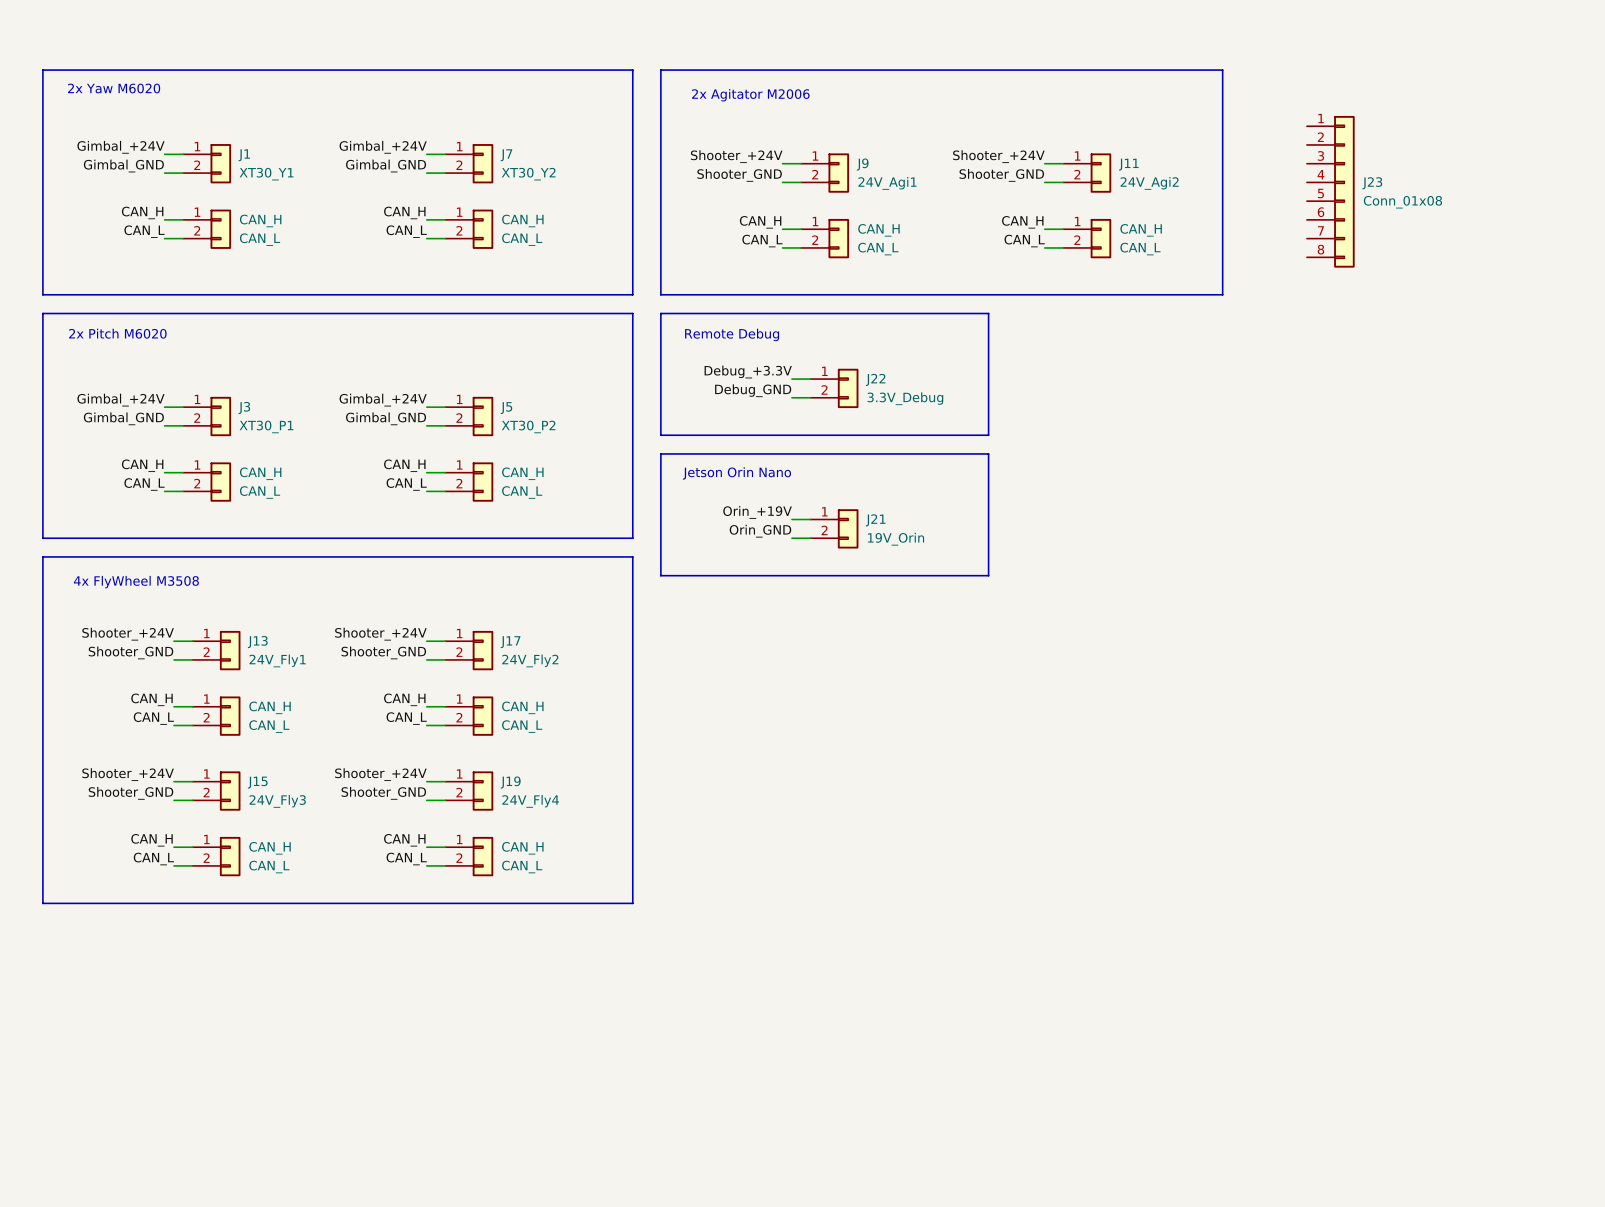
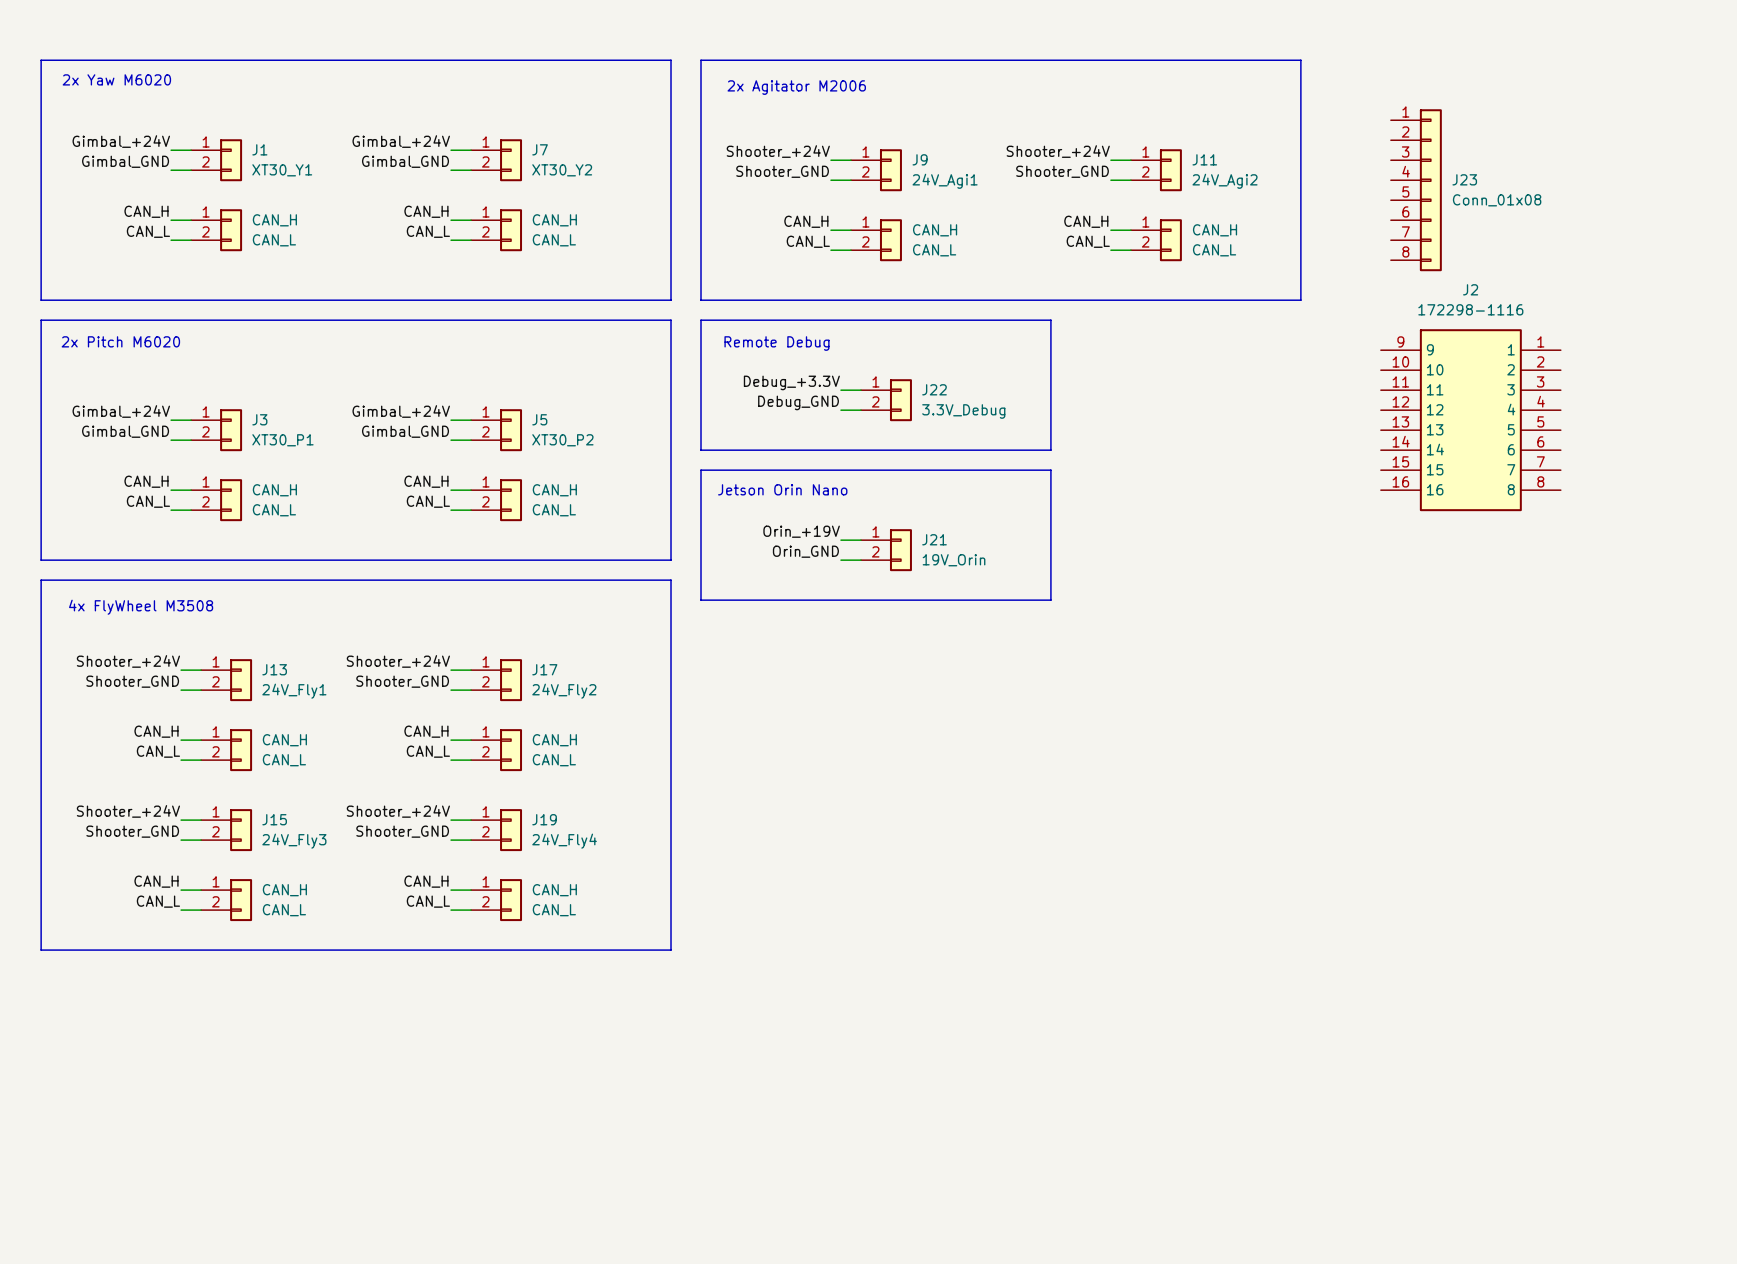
J2: none -> 172298-1116 (1470, 420)

